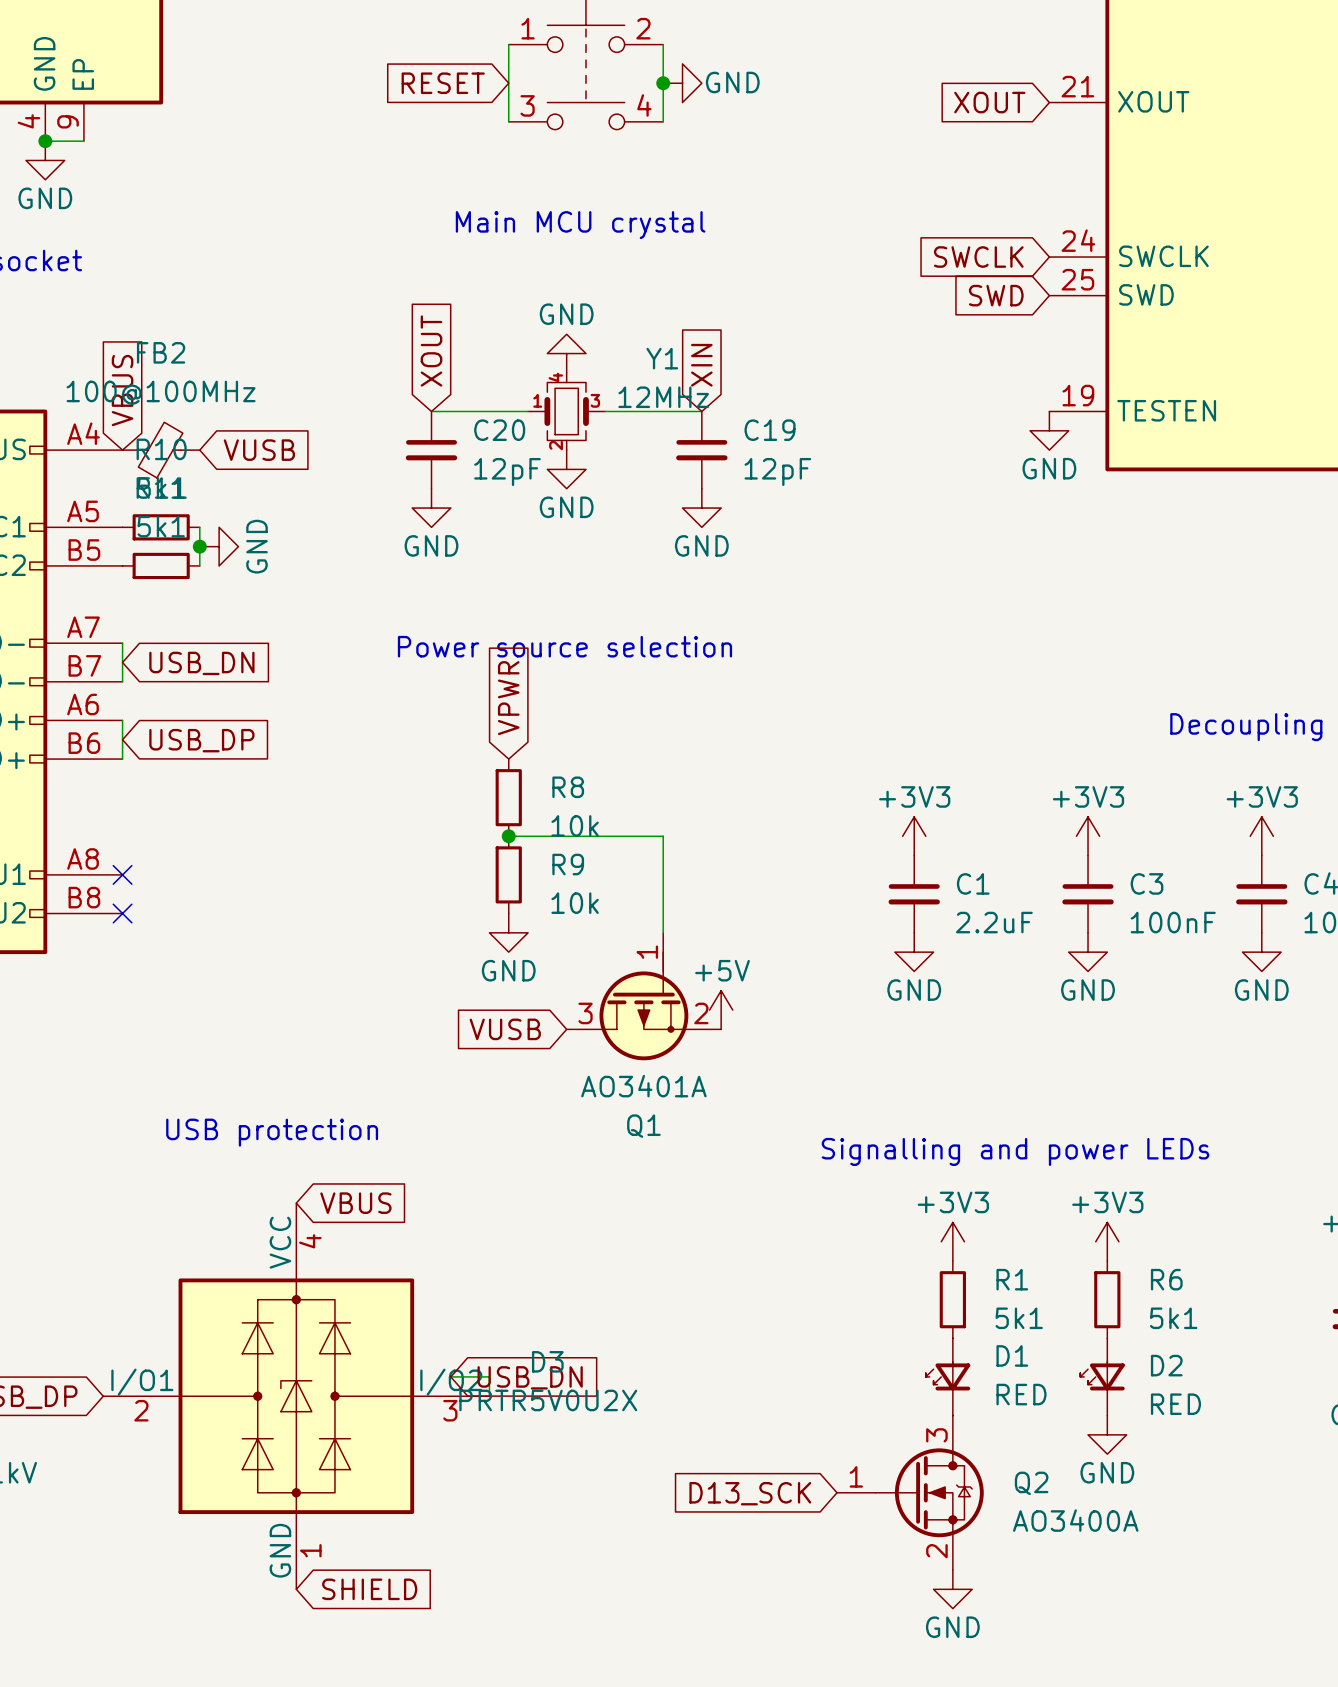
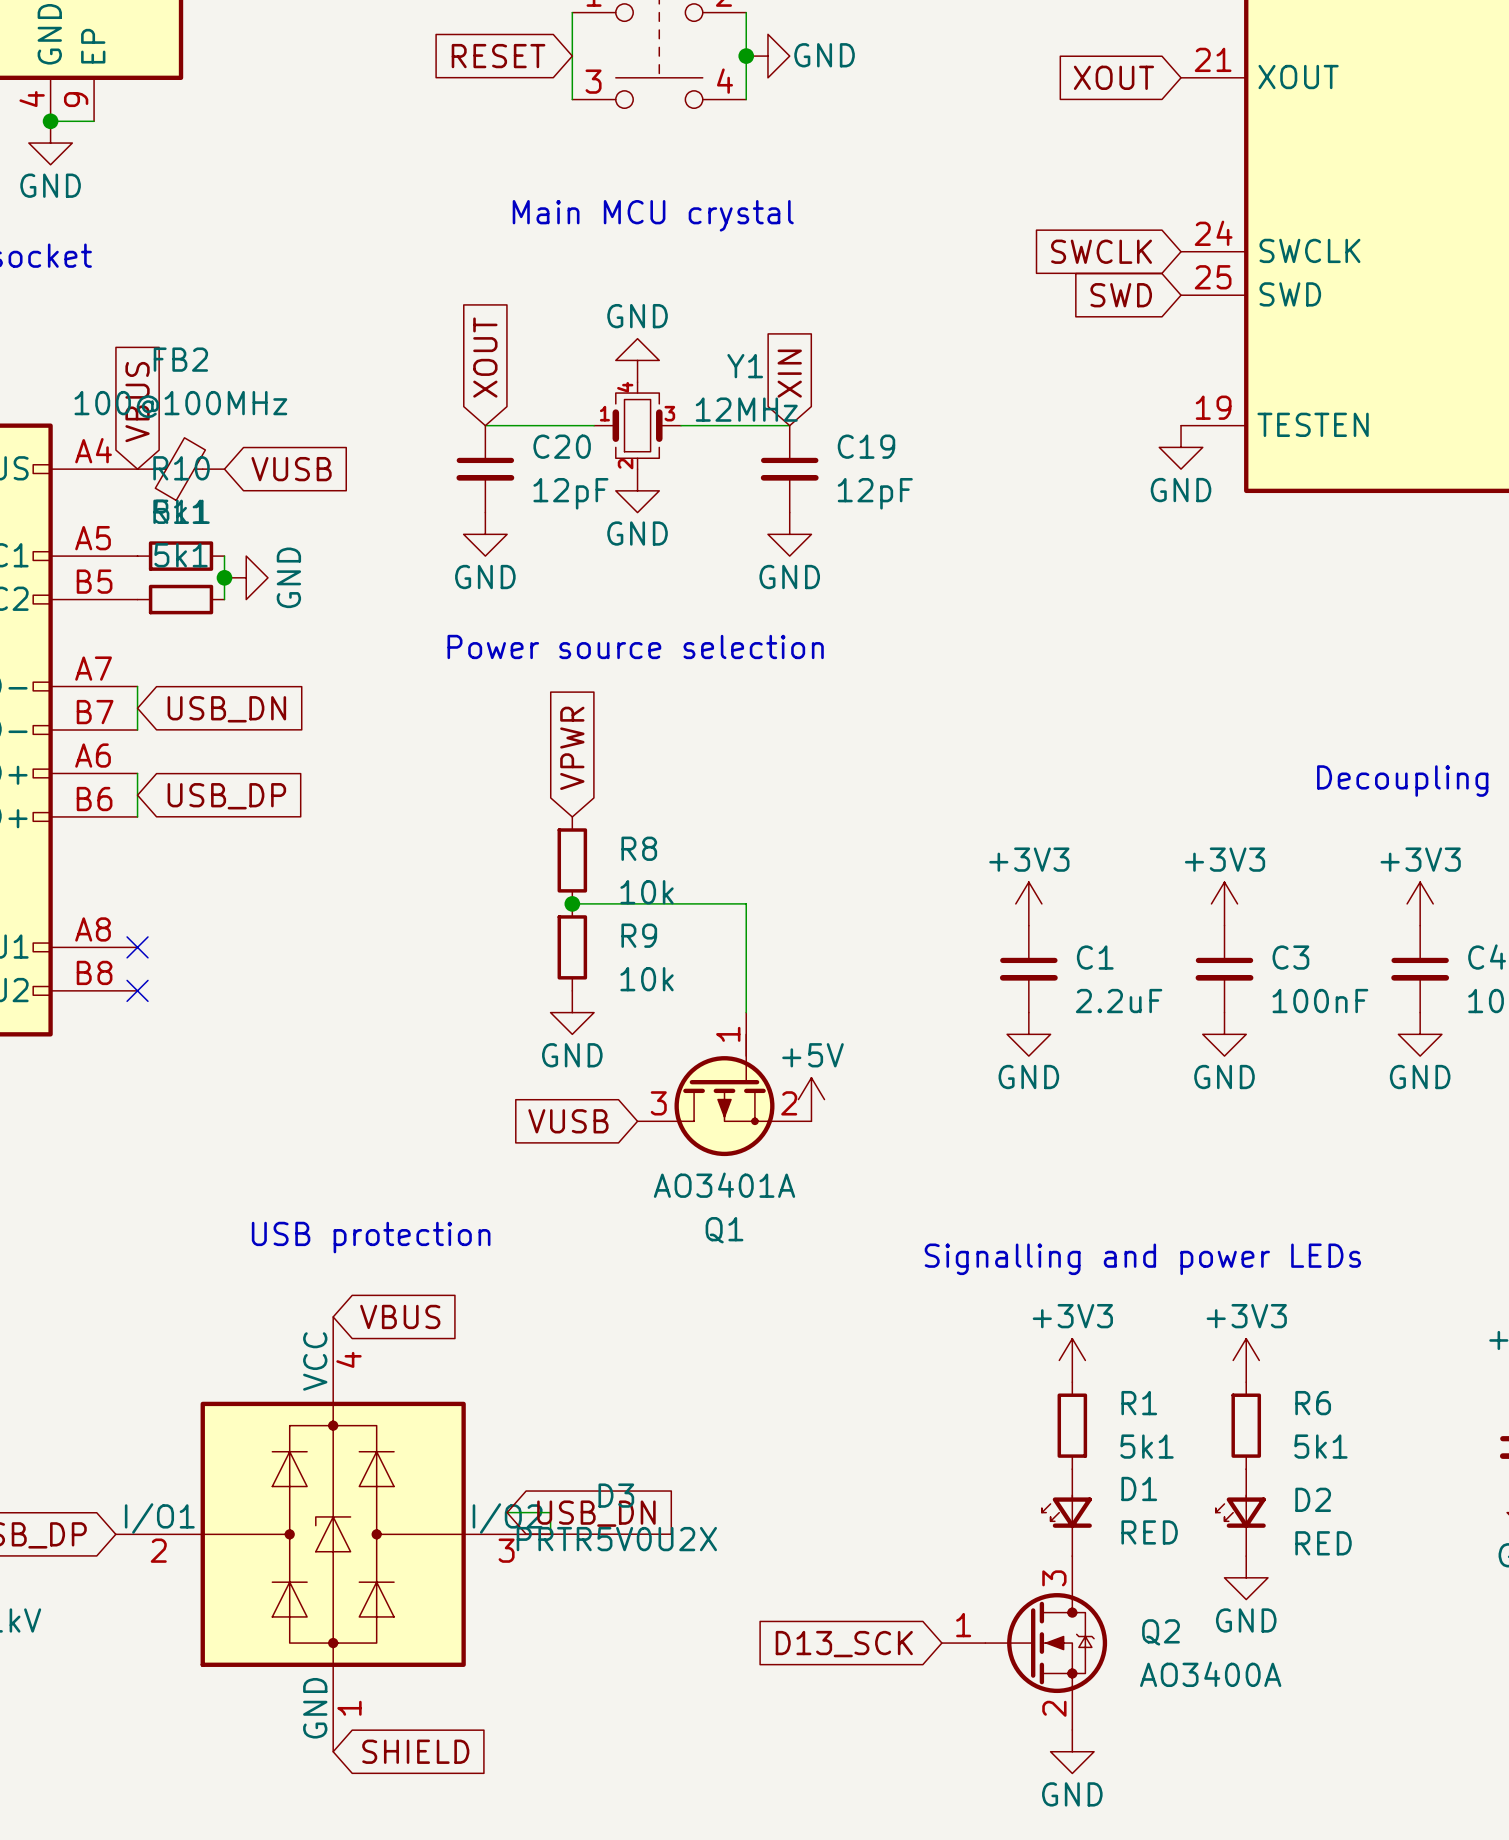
text position: Power source selection (564, 646) -> Power source selection (635, 646)
text position: USB protection (272, 1132) -> USB protection (371, 1237)

